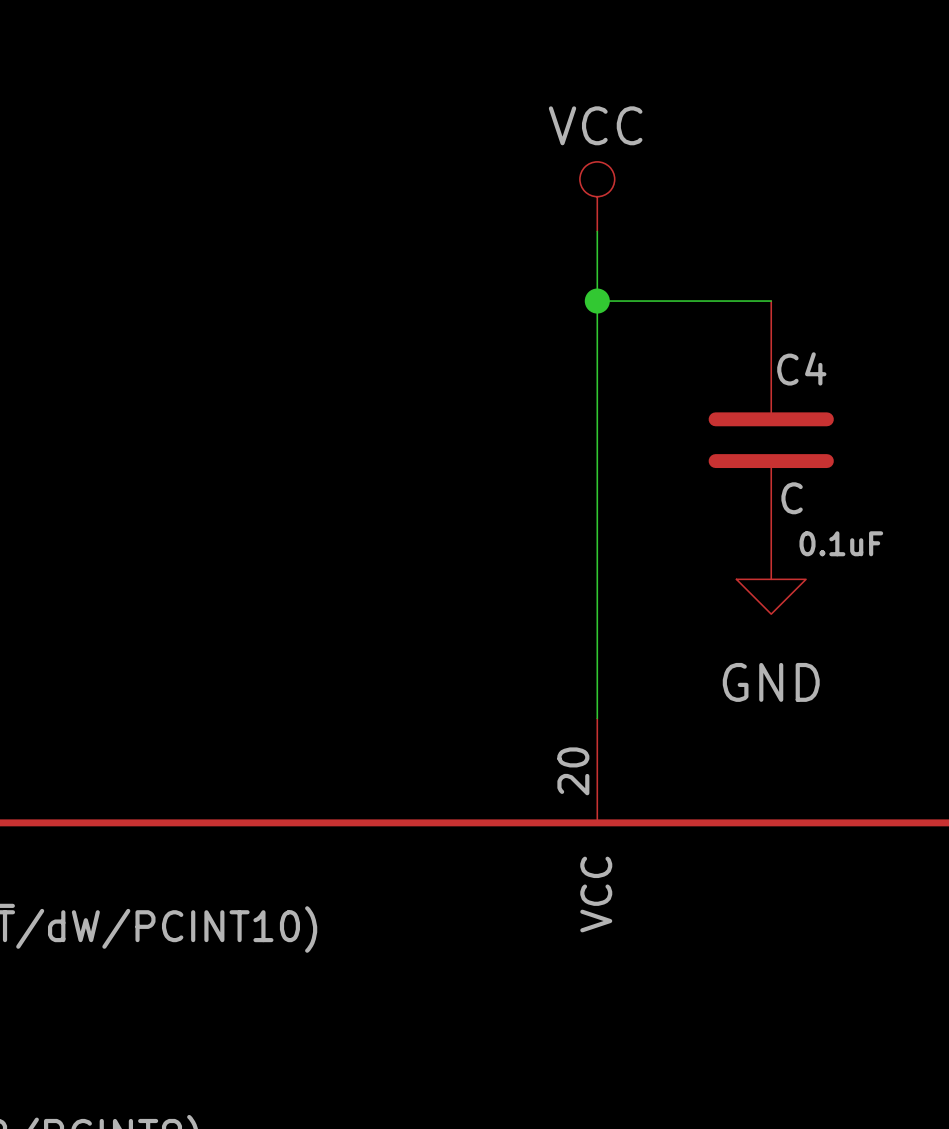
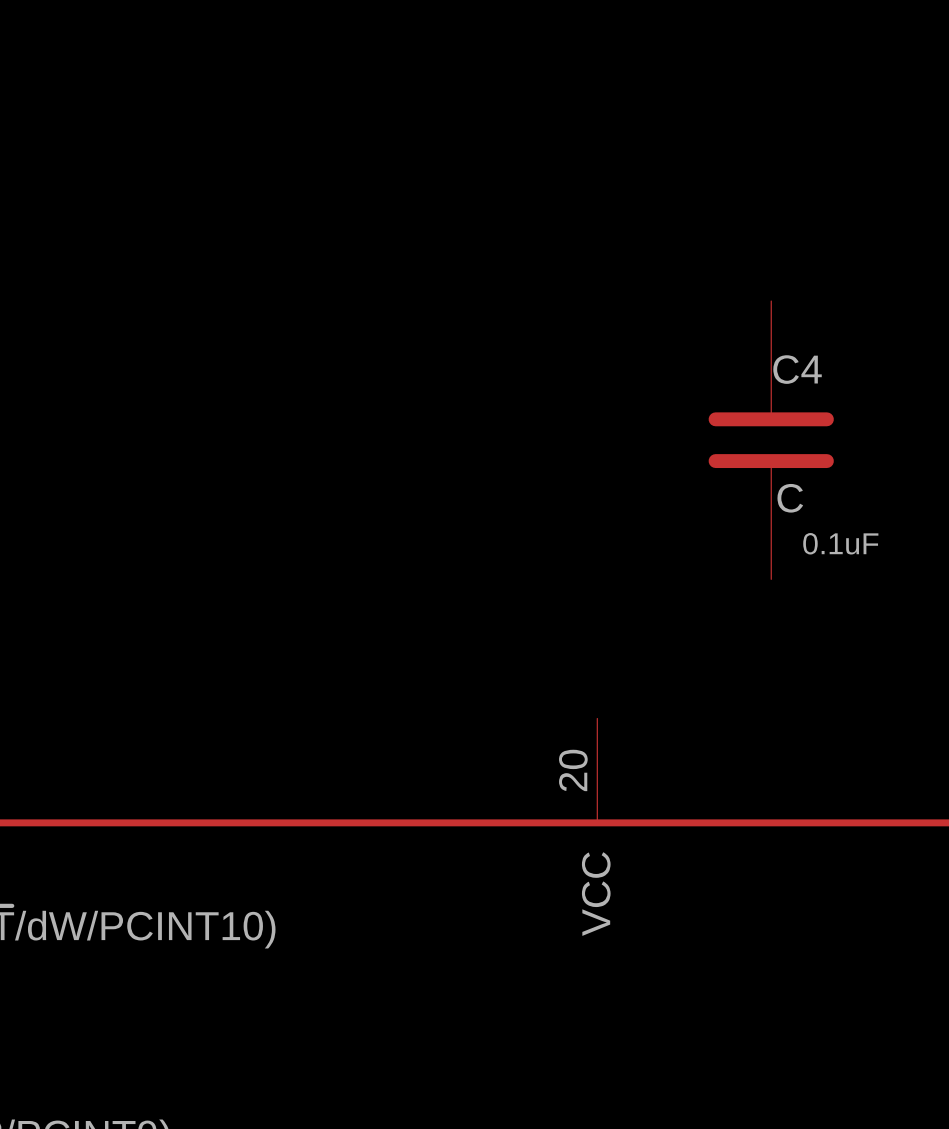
power symbol: VCC (597, 196) -> none
wire: (597, 231) (597, 718) -> none
wire: (597, 301) (771, 301) -> none
junction: (597, 301) -> none
power symbol: GND (771, 596) -> none

